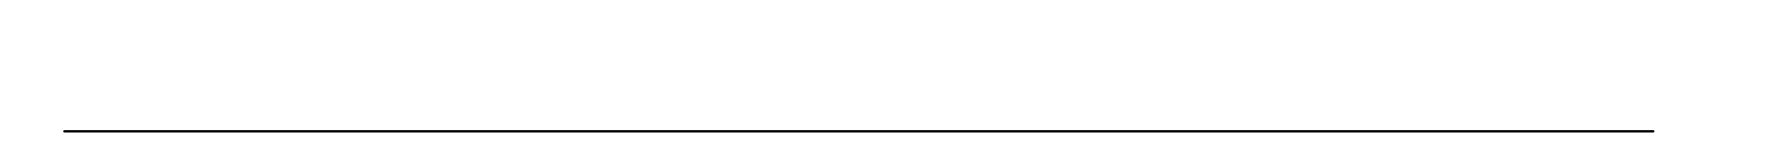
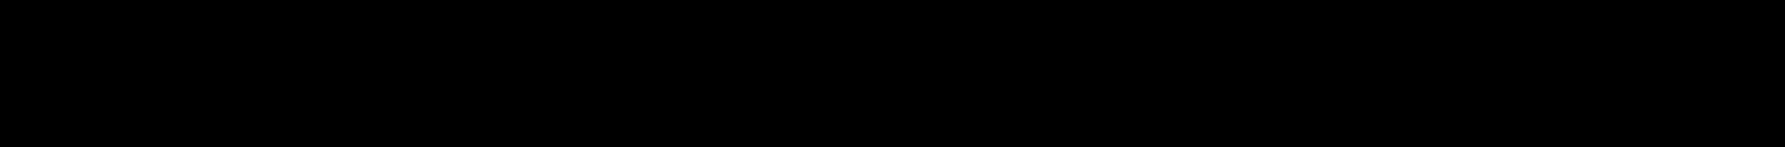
board edge: (1653, 131) (64, 131) -> none

